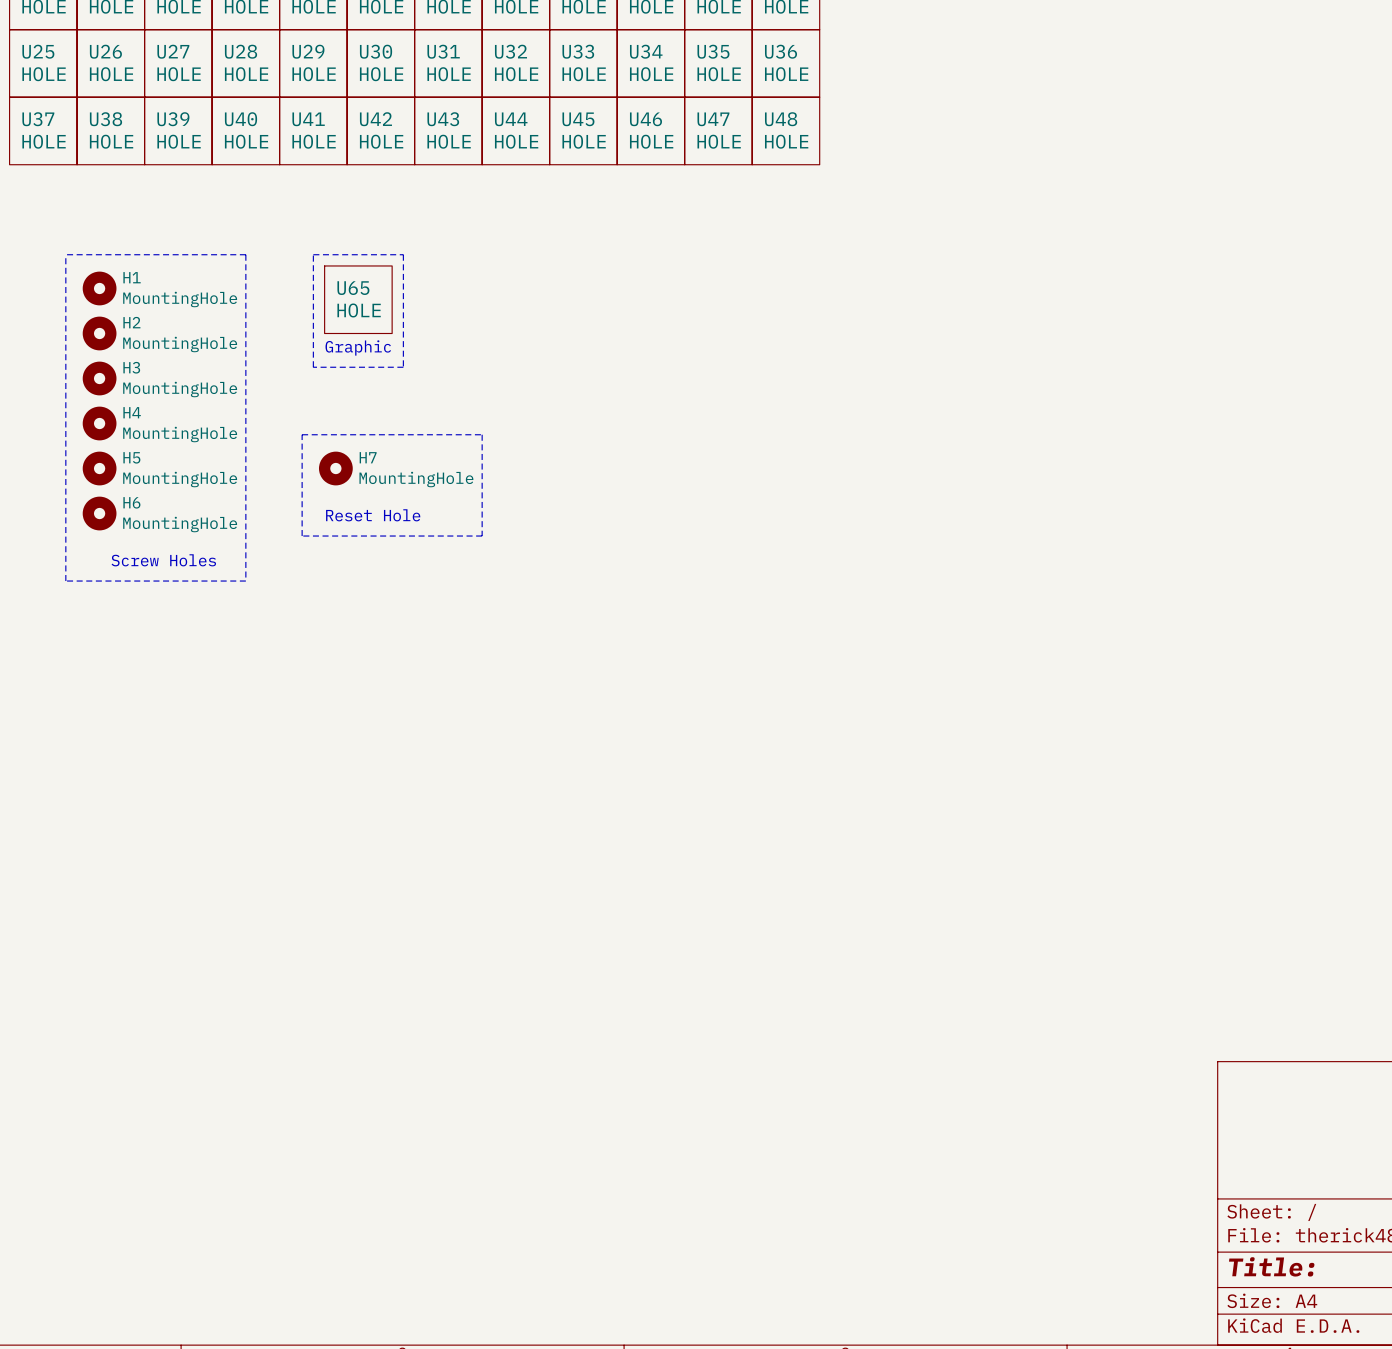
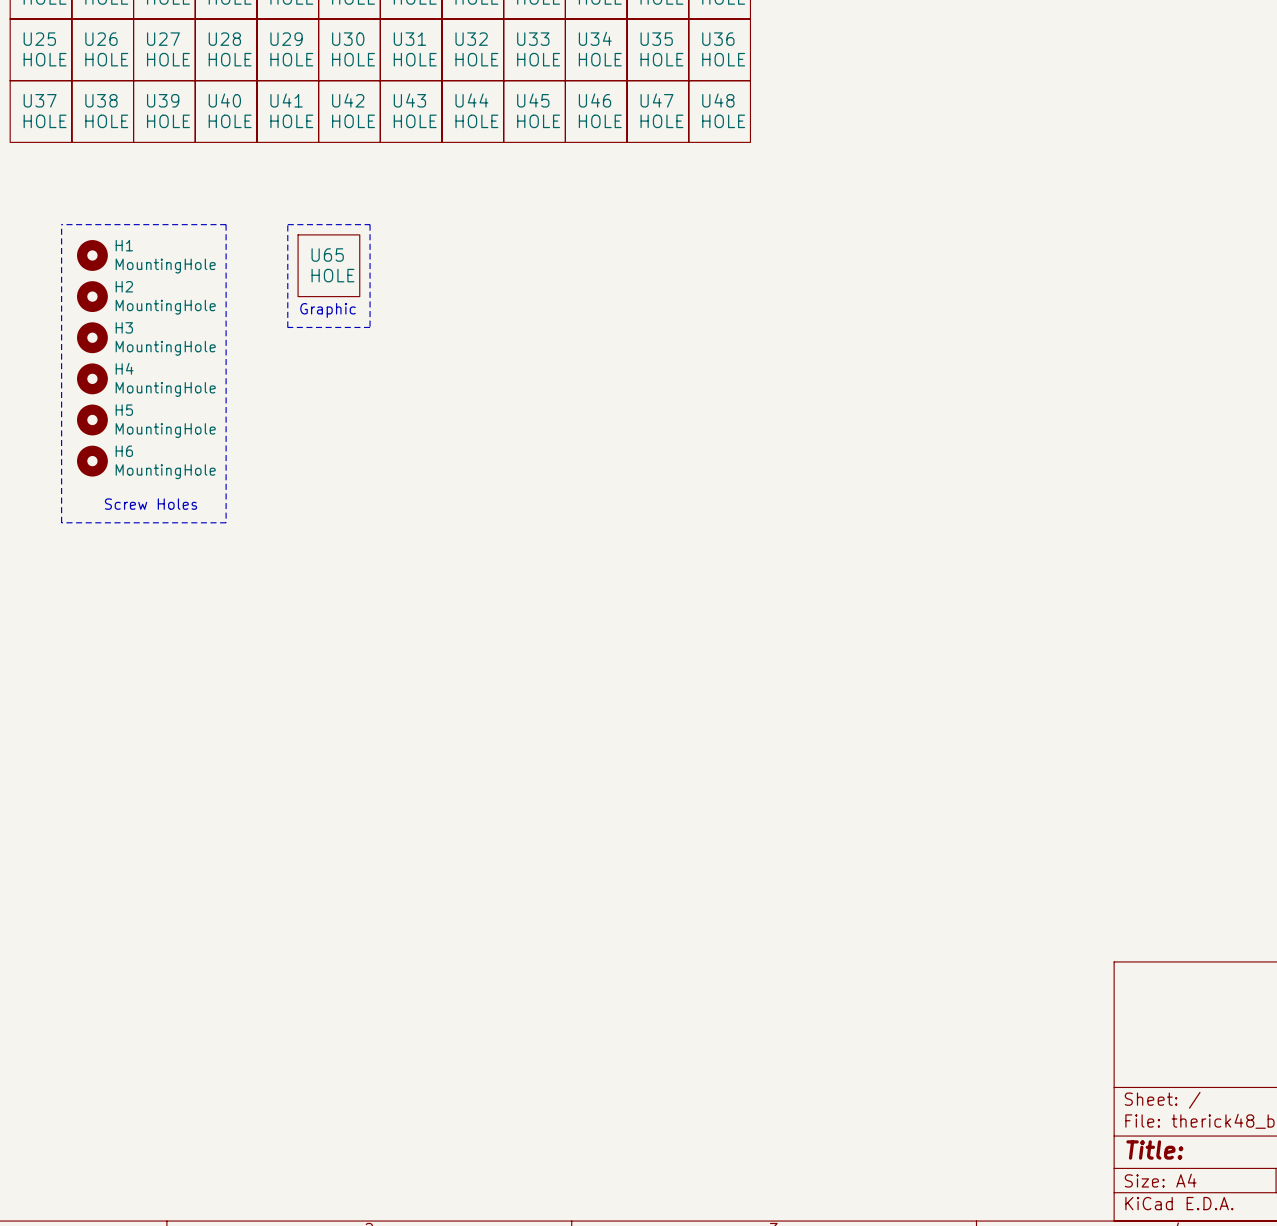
line: (302, 434) (302, 536) (482, 536) (482, 434) (302, 434) -> none
H7: MountingHole (335, 468) -> none
text: Reset Hole (373, 515) -> none

